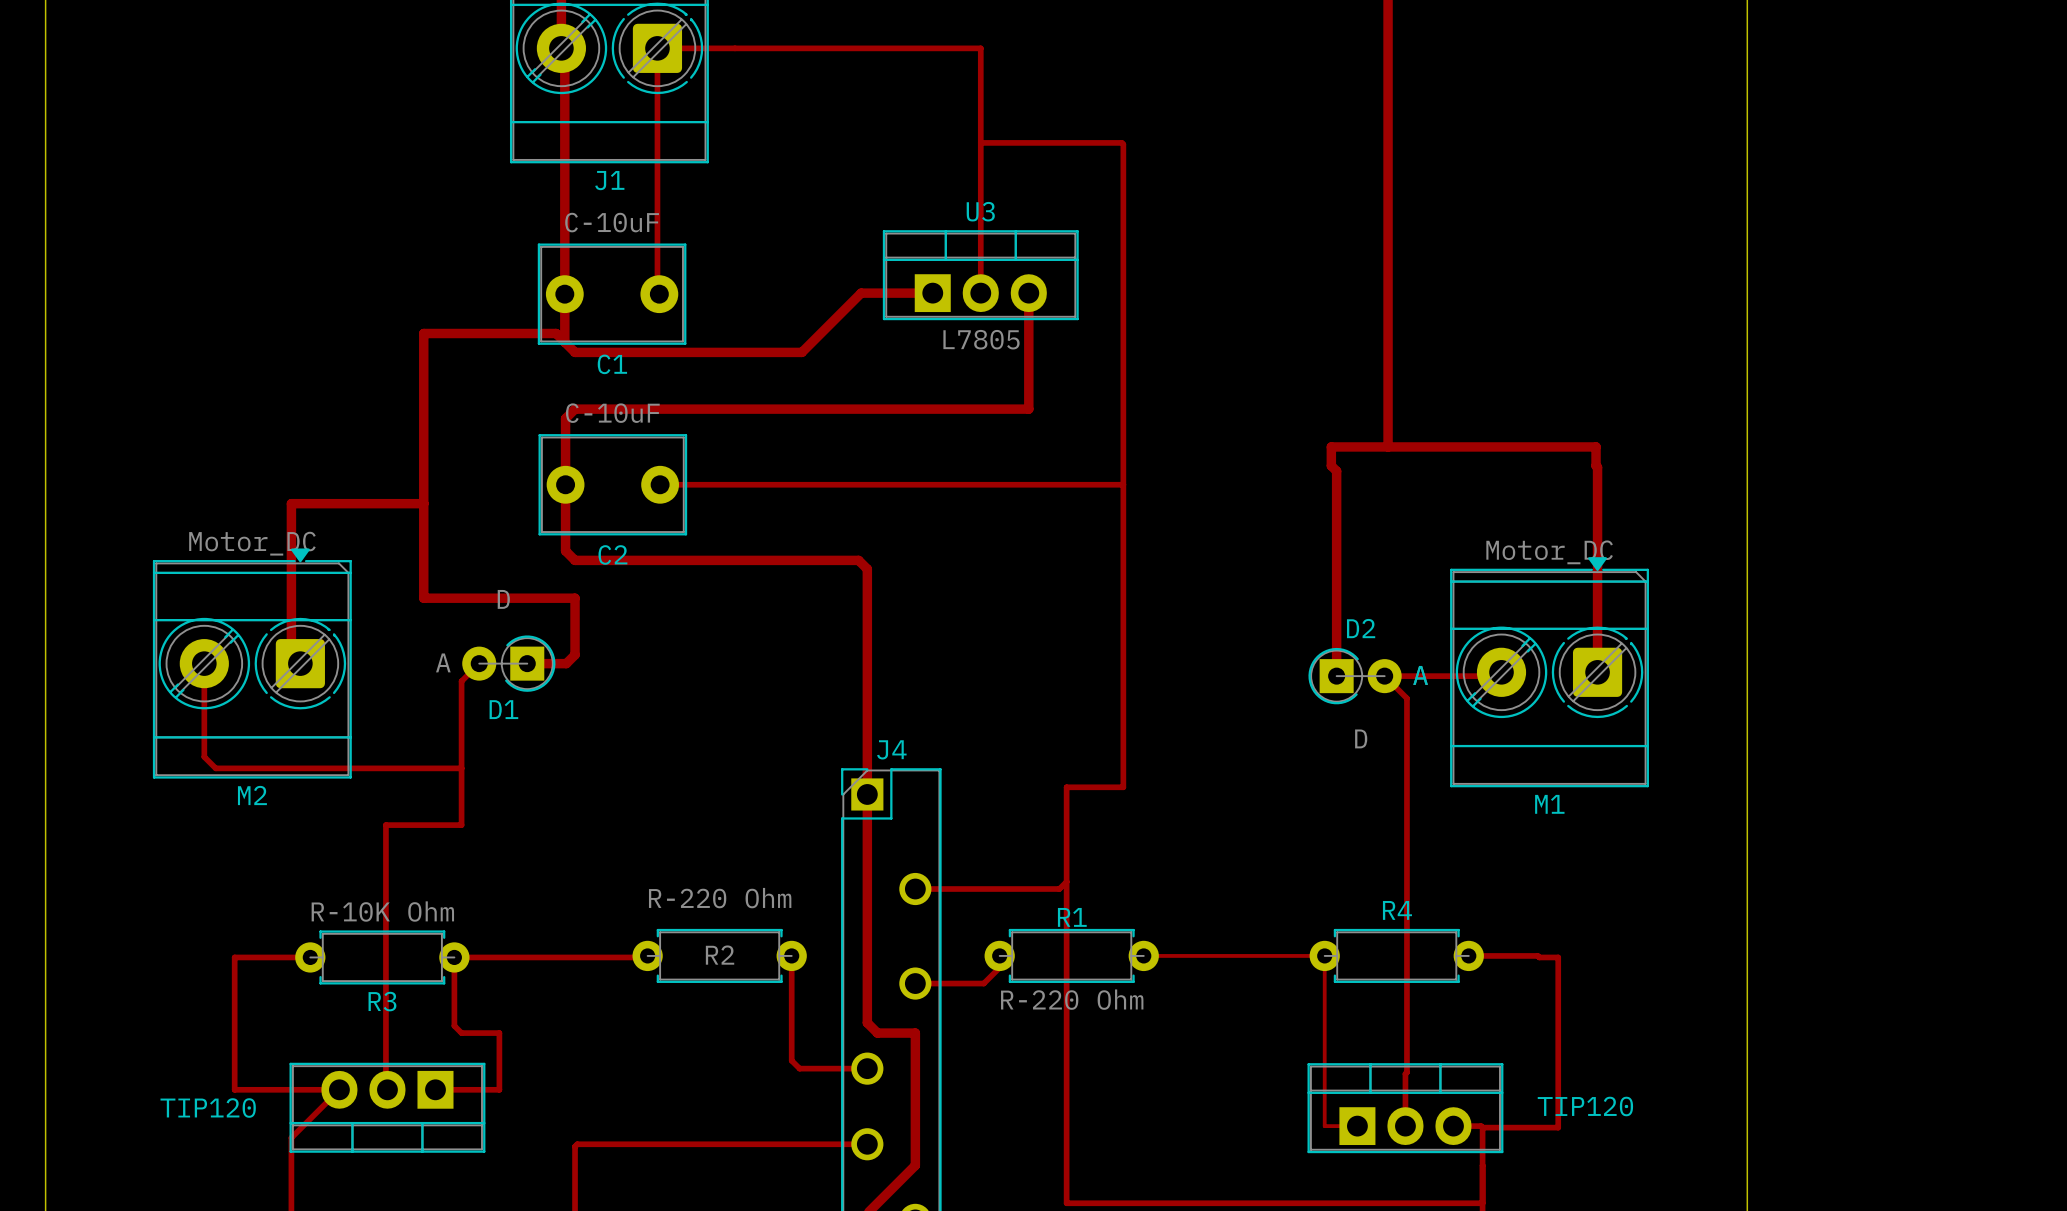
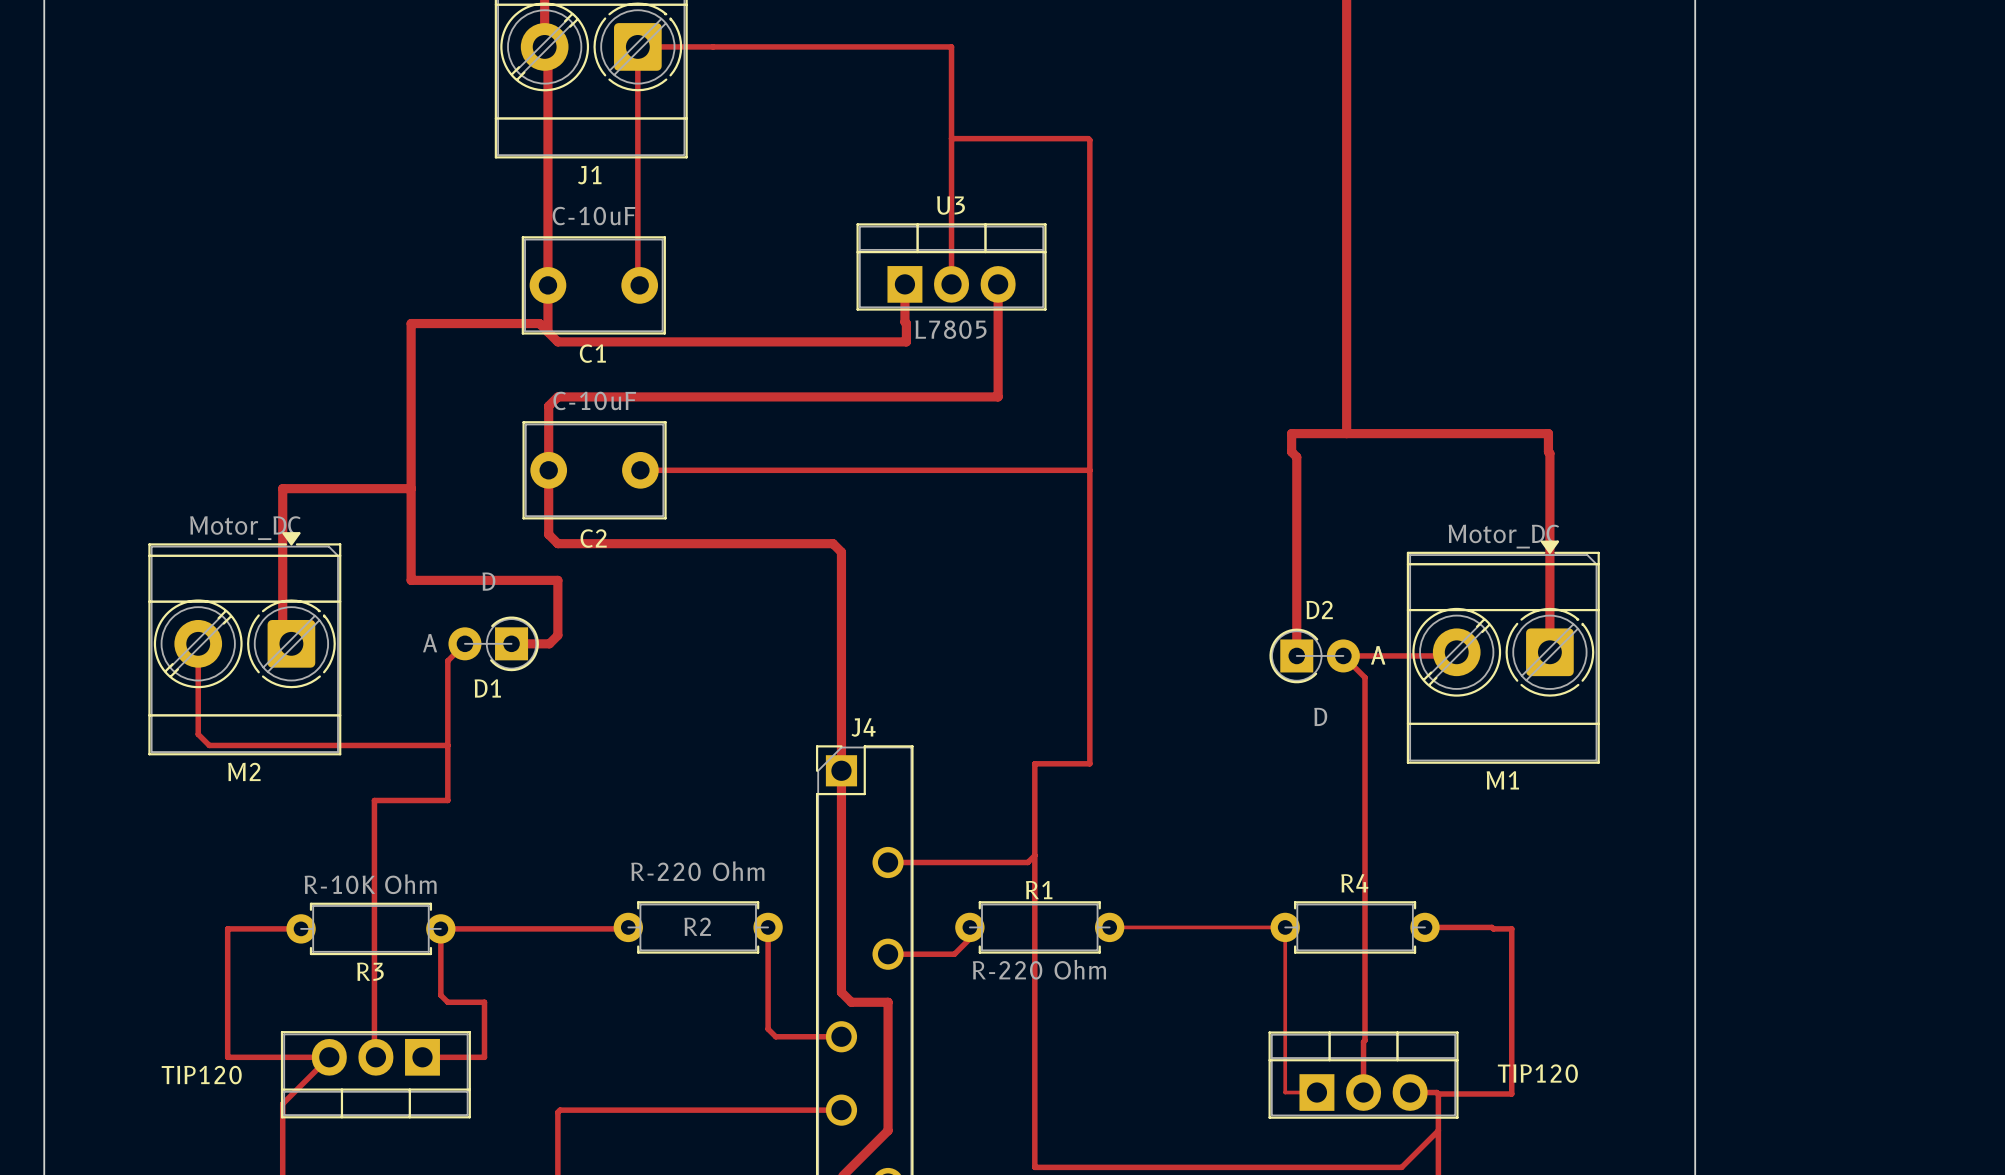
track: (932, 293) (861, 293) (801, 352) -> (904, 284) (906, 341) (778, 341)
track: (1444, 1203) (1482, 1203) -> (1401, 1167) (1438, 1130)

